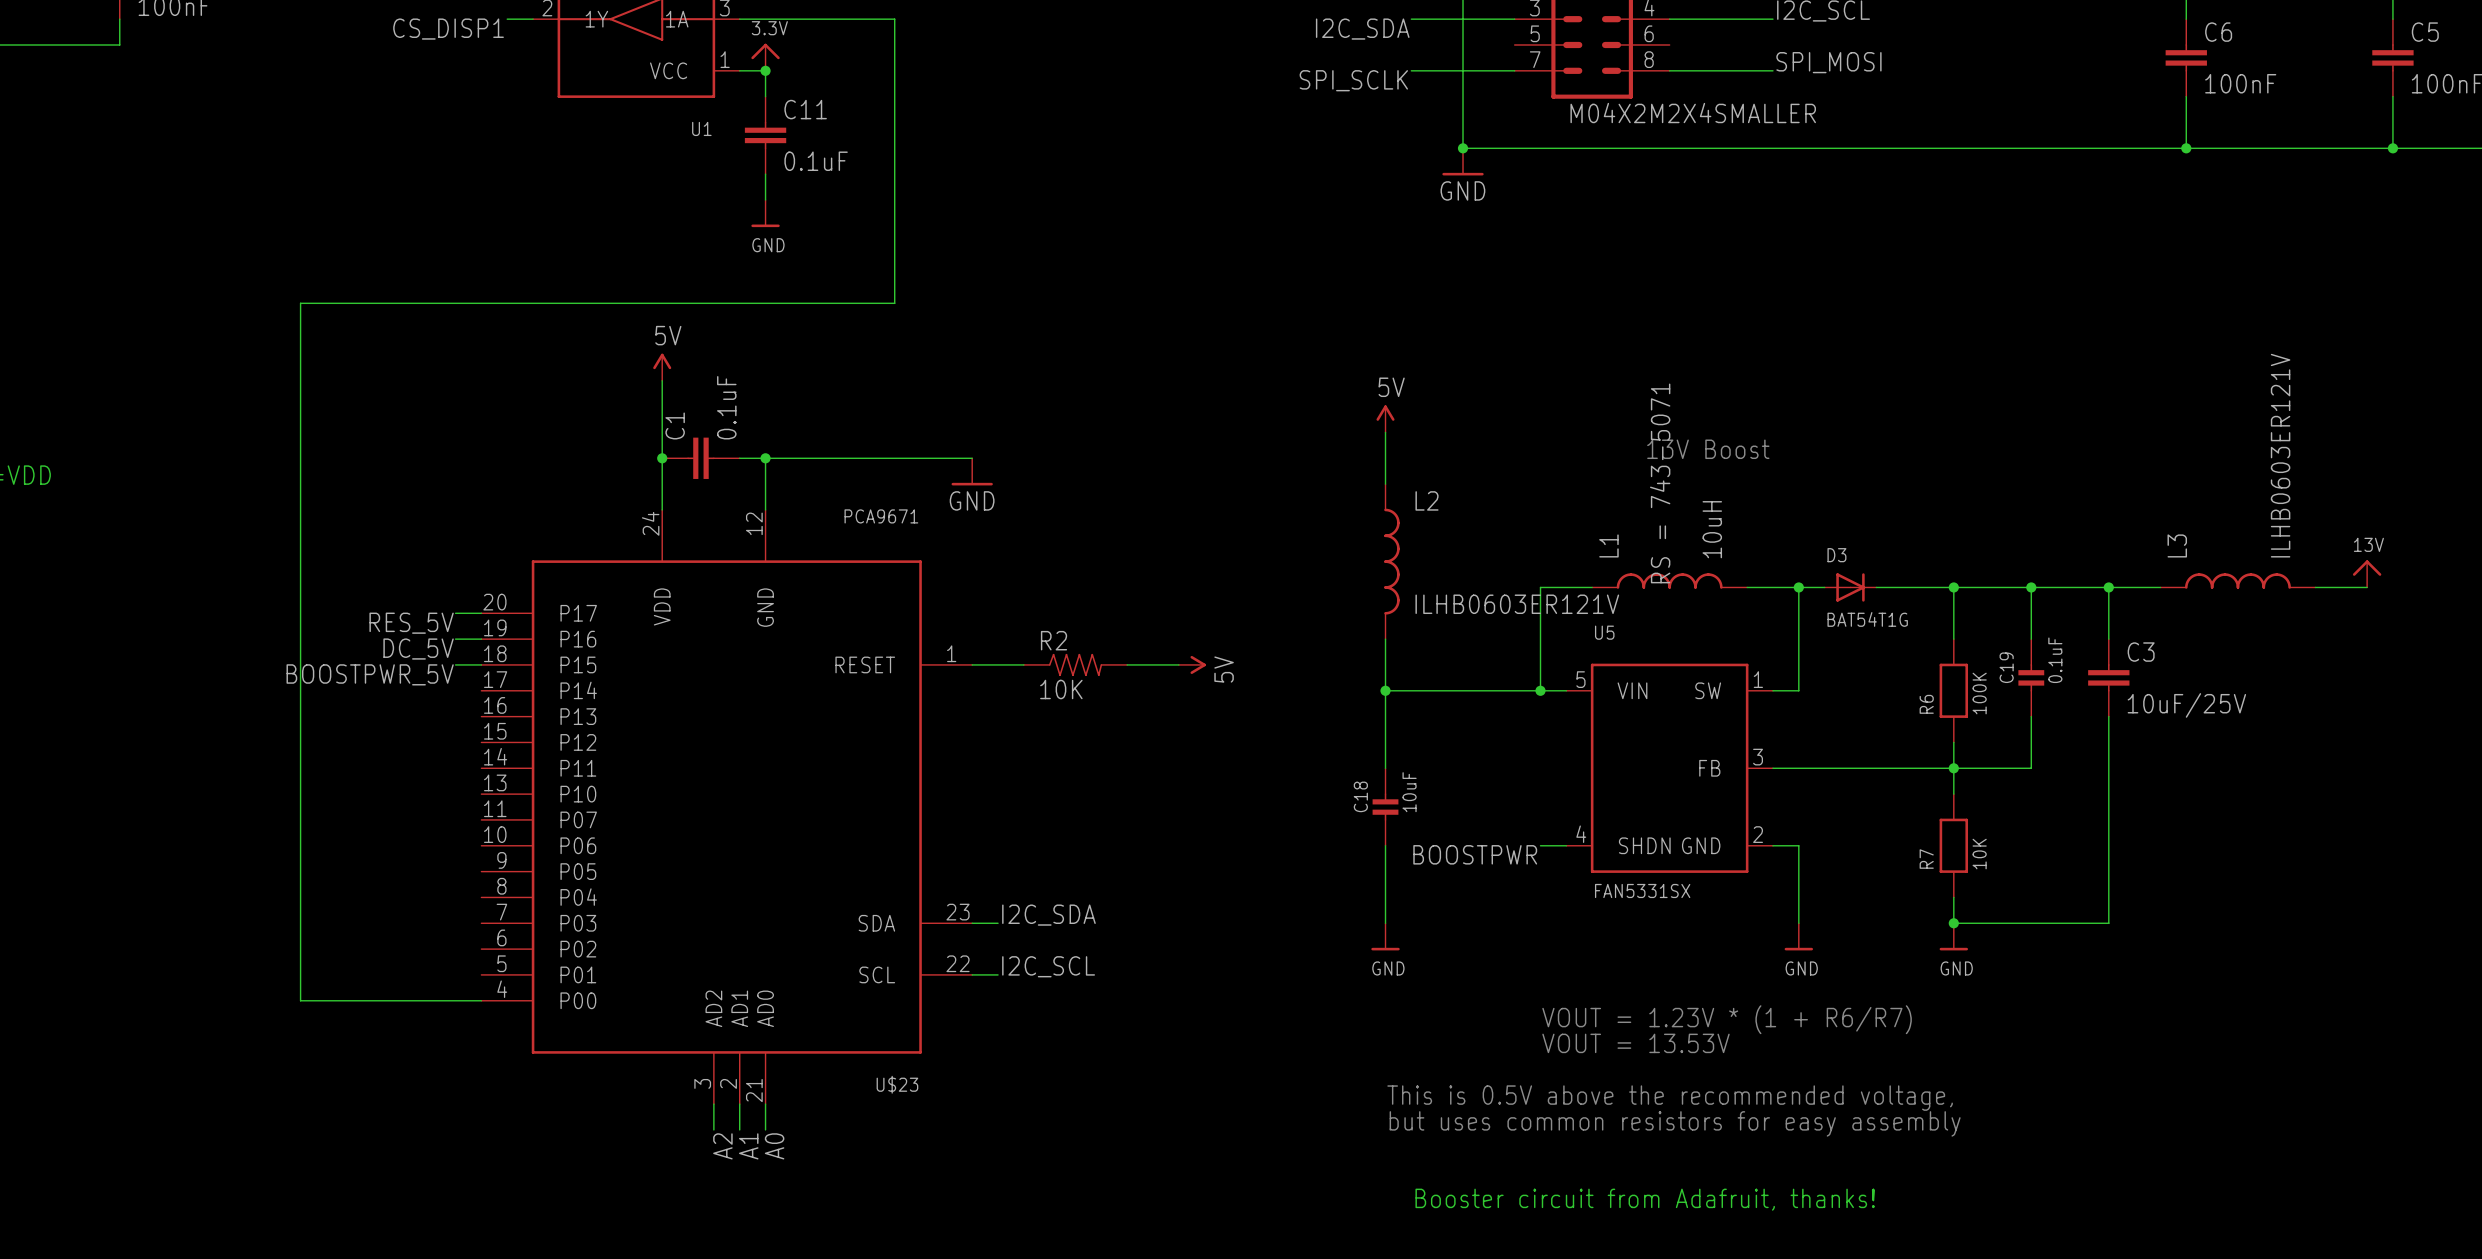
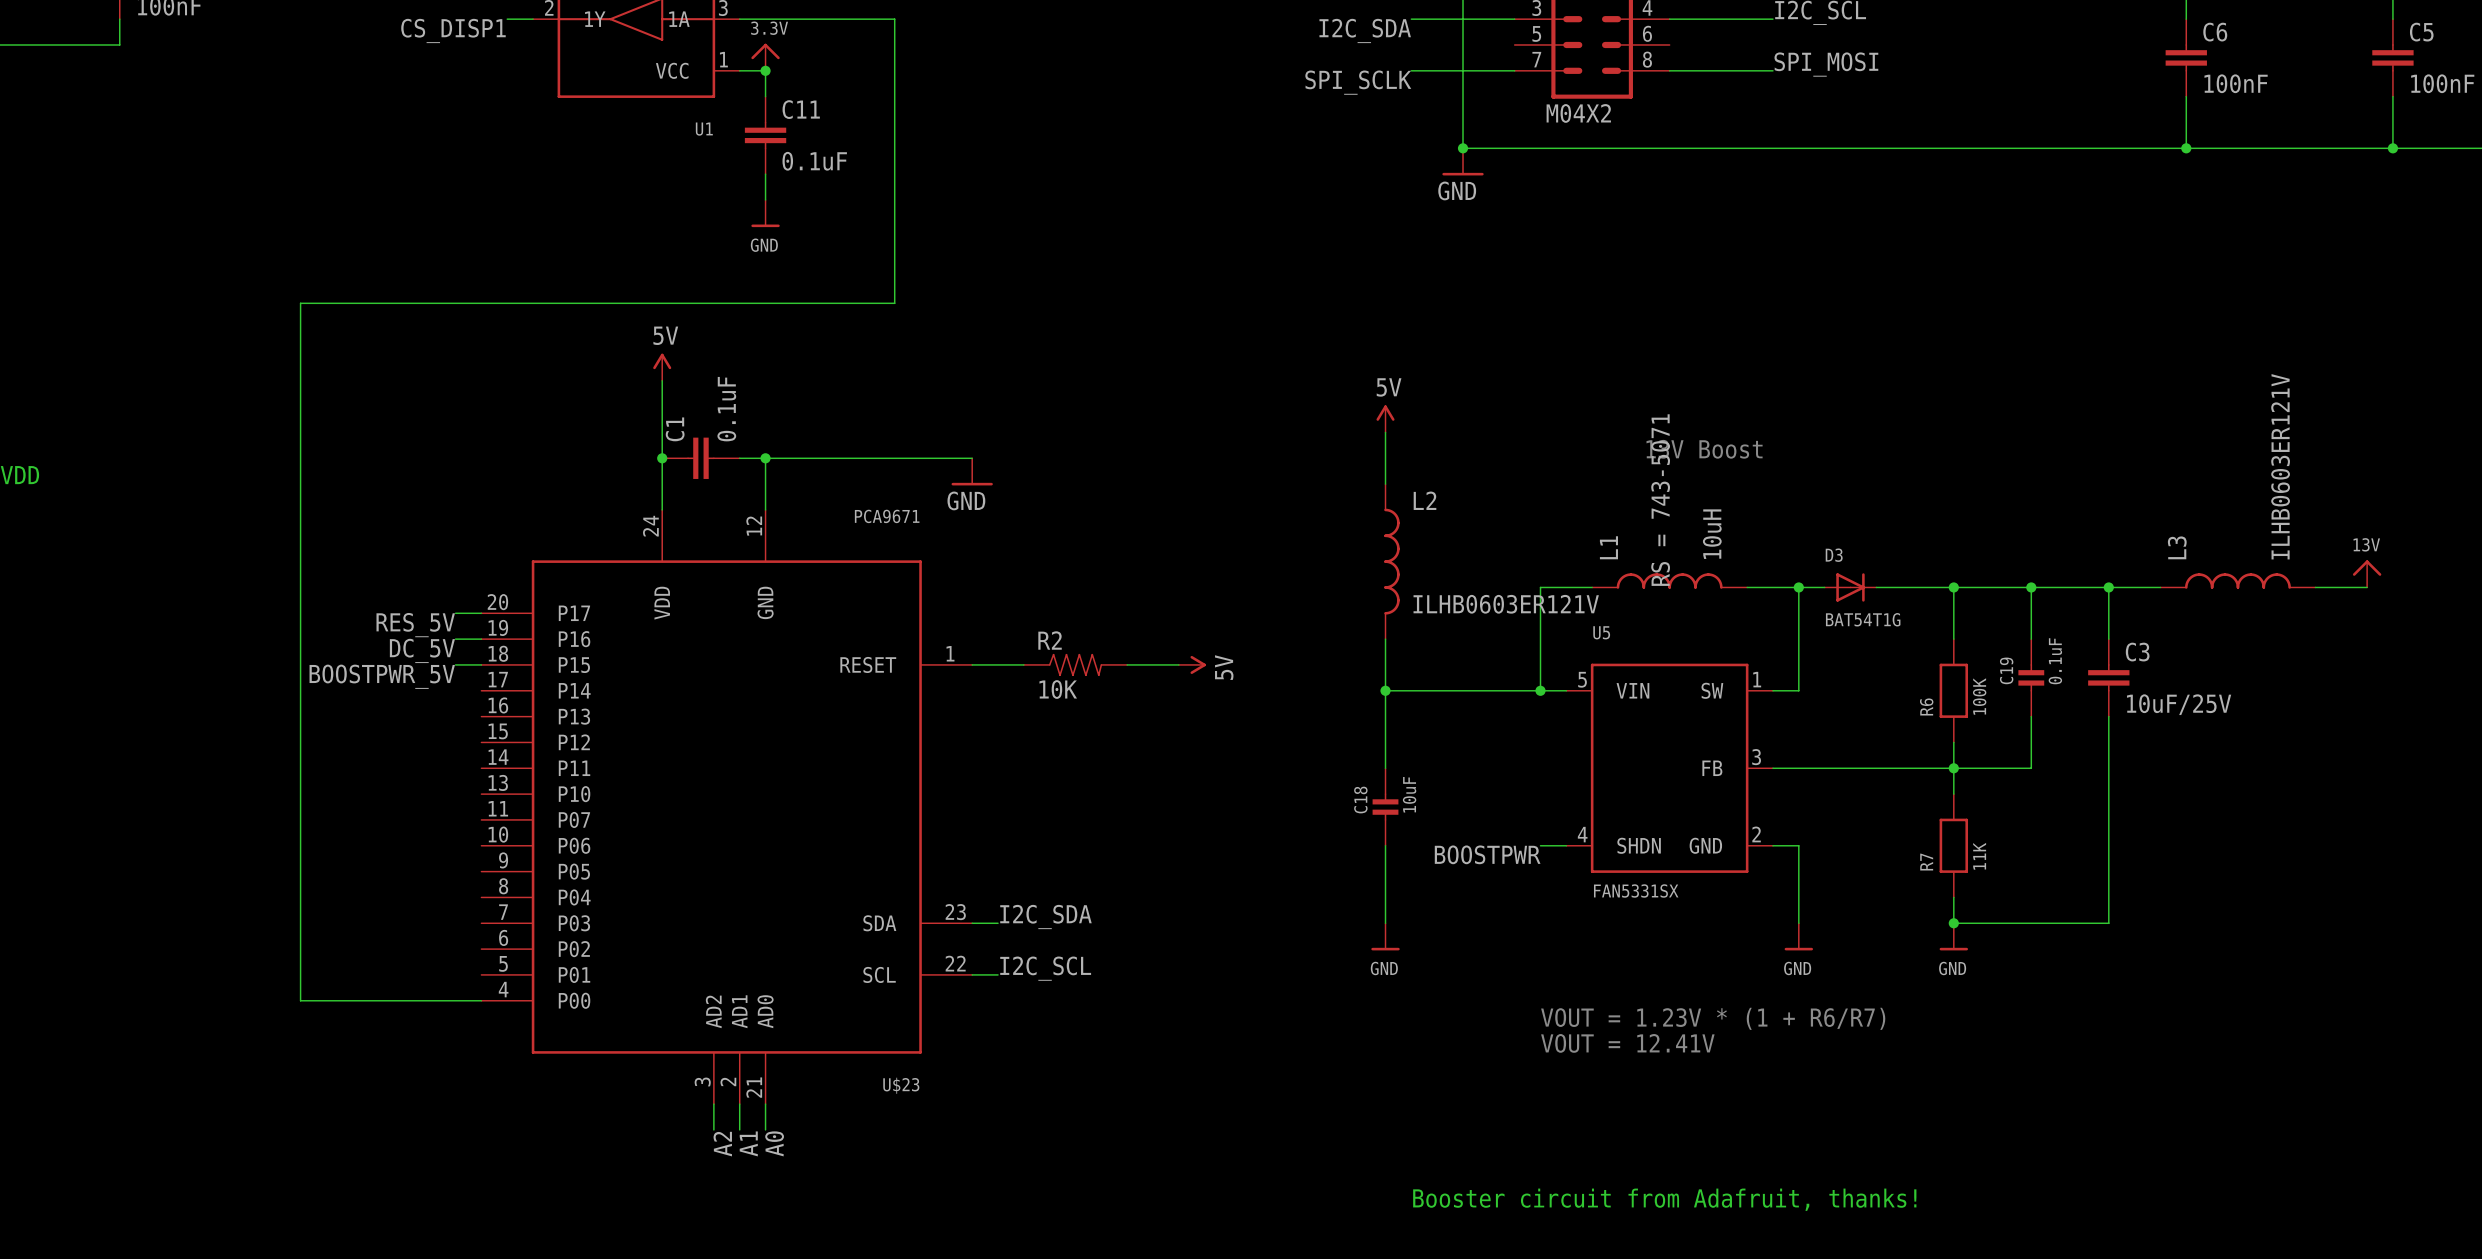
part value: M04X2M2X4SMALLER (1693, 113) -> M04X2 (1578, 113)
R7 value: 10K (1979, 854) -> 11K (1979, 856)
text: VOUT = 13.53V (1635, 1043) -> VOUT = 12.41V (1627, 1043)
text: This is 0.5V above the recommended voltage, (1670, 1098) -> none
text: but uses common resistors for easy assembly (1675, 1123) -> none

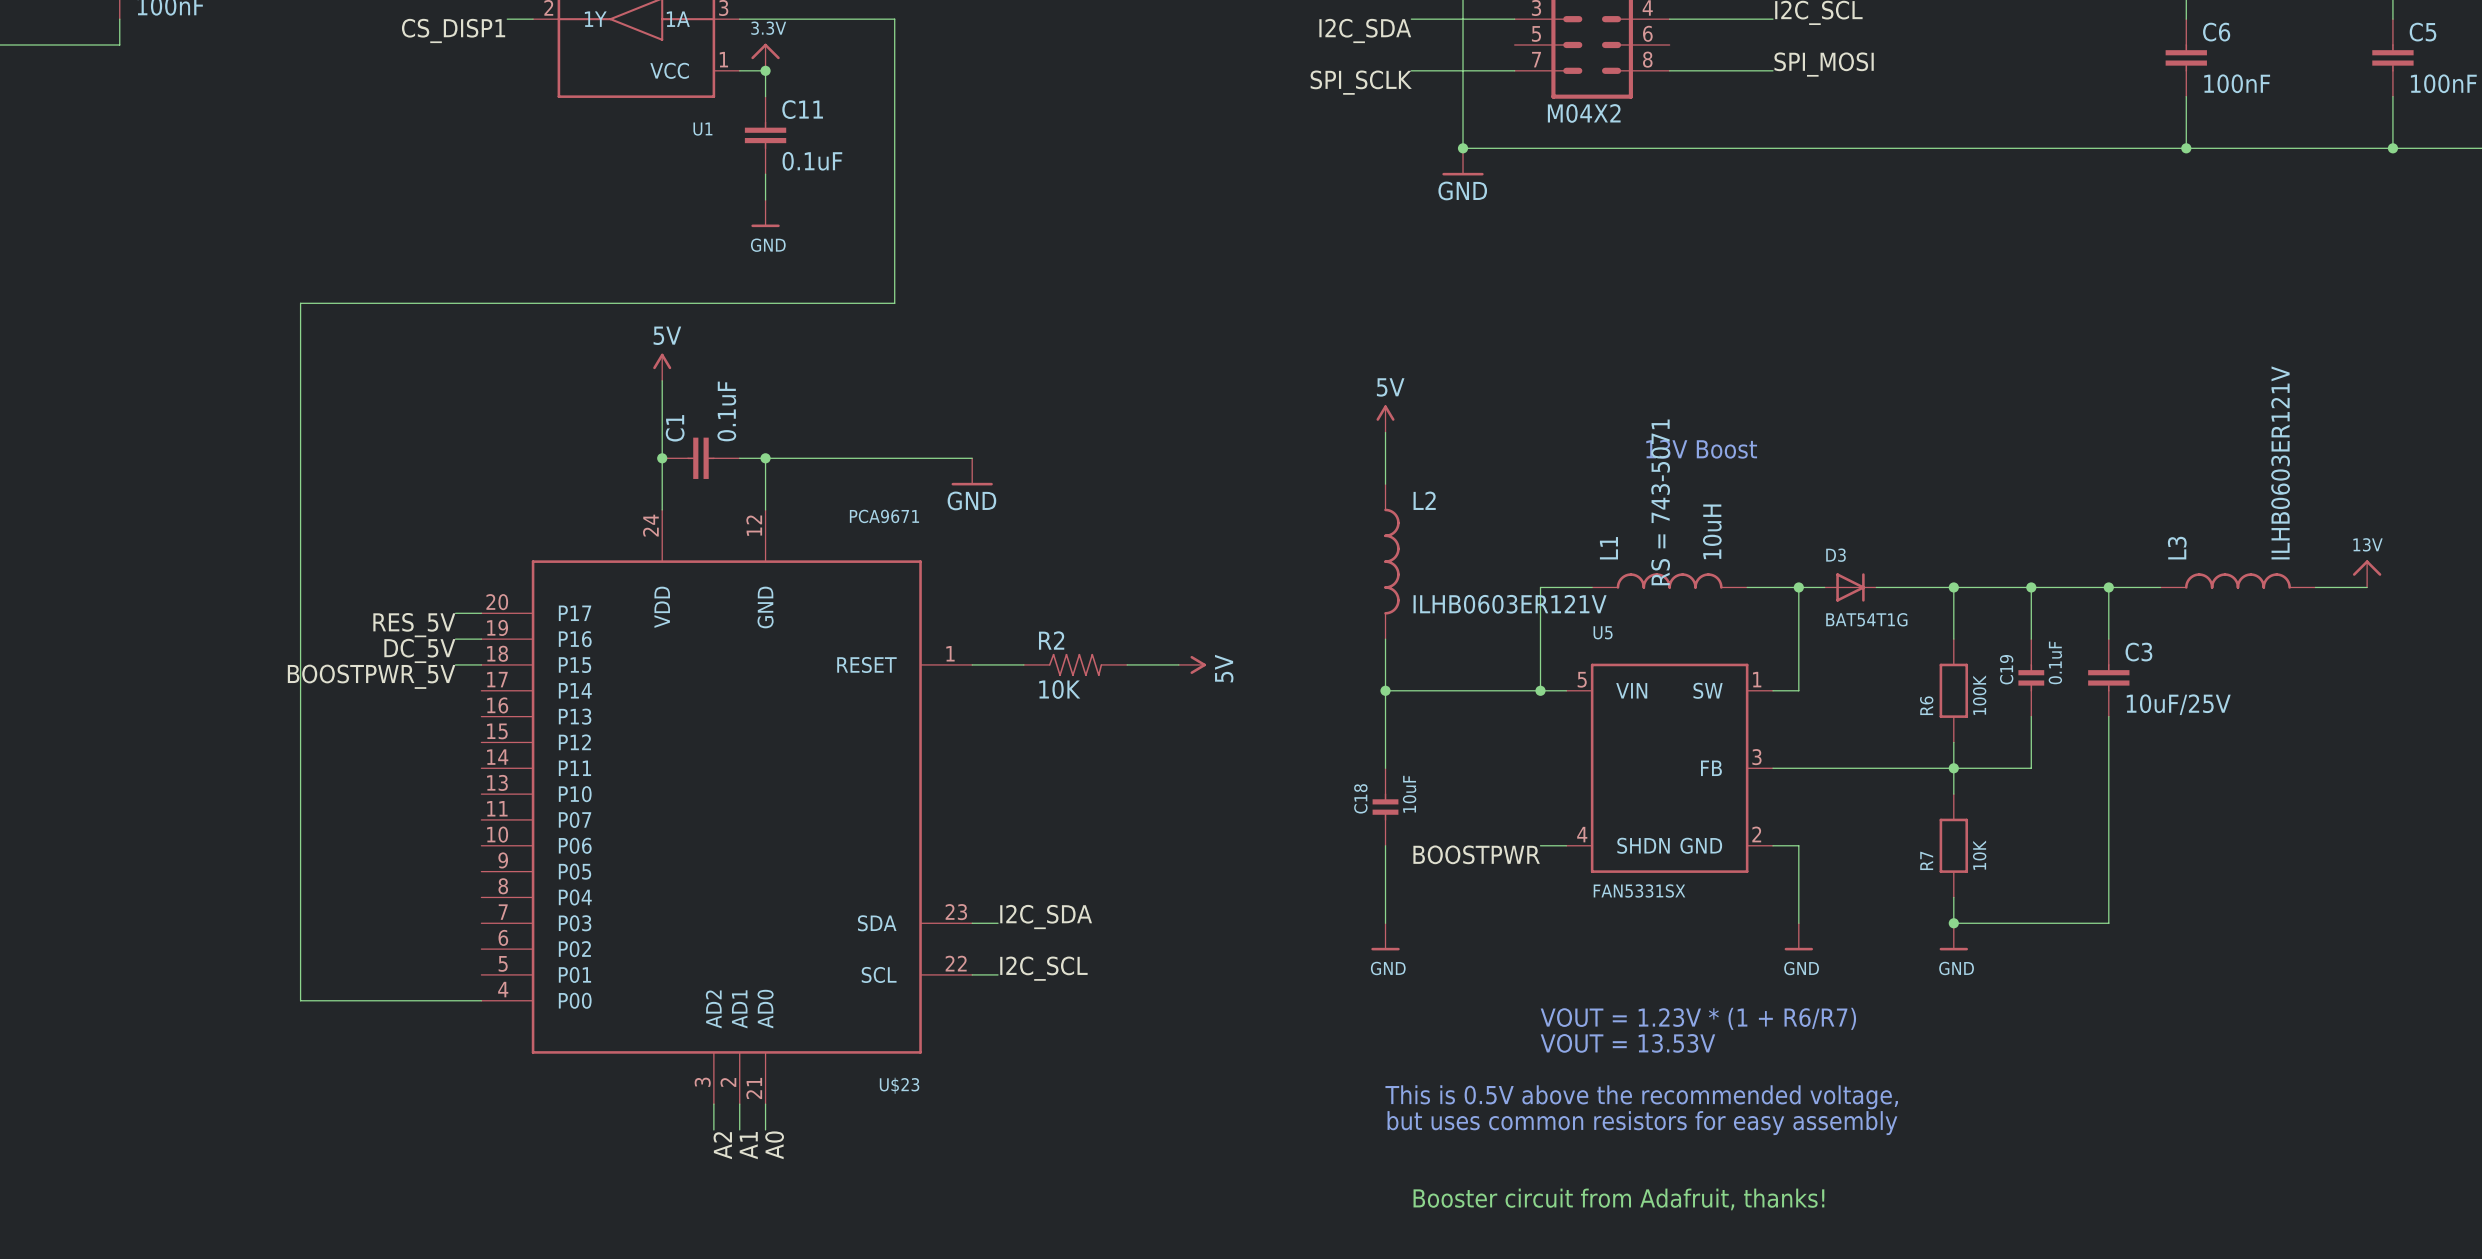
R7 value: 11K (1979, 856) -> 10K (1979, 855)
text: VOUT = 12.41V (1627, 1043) -> VOUT = 13.53V (1627, 1043)
text: none -> This is 0.5V above the recommended voltage, (1641, 1097)
text: none -> but uses common resistors for easy assembly (1642, 1123)

